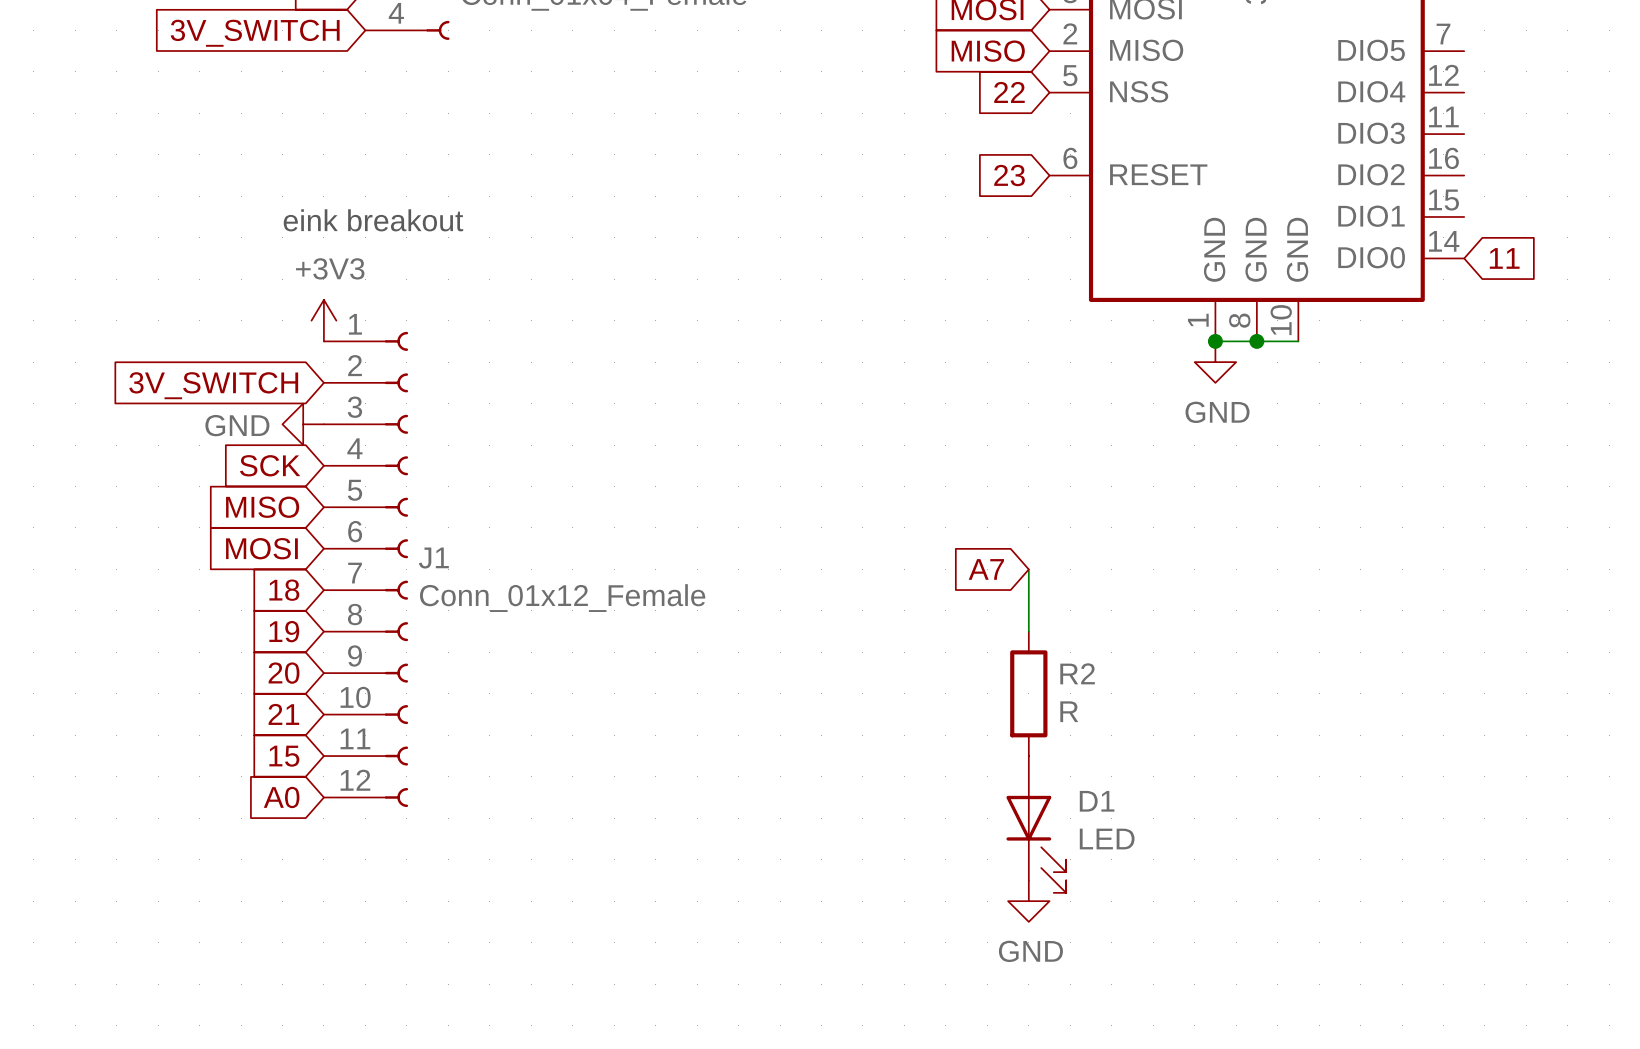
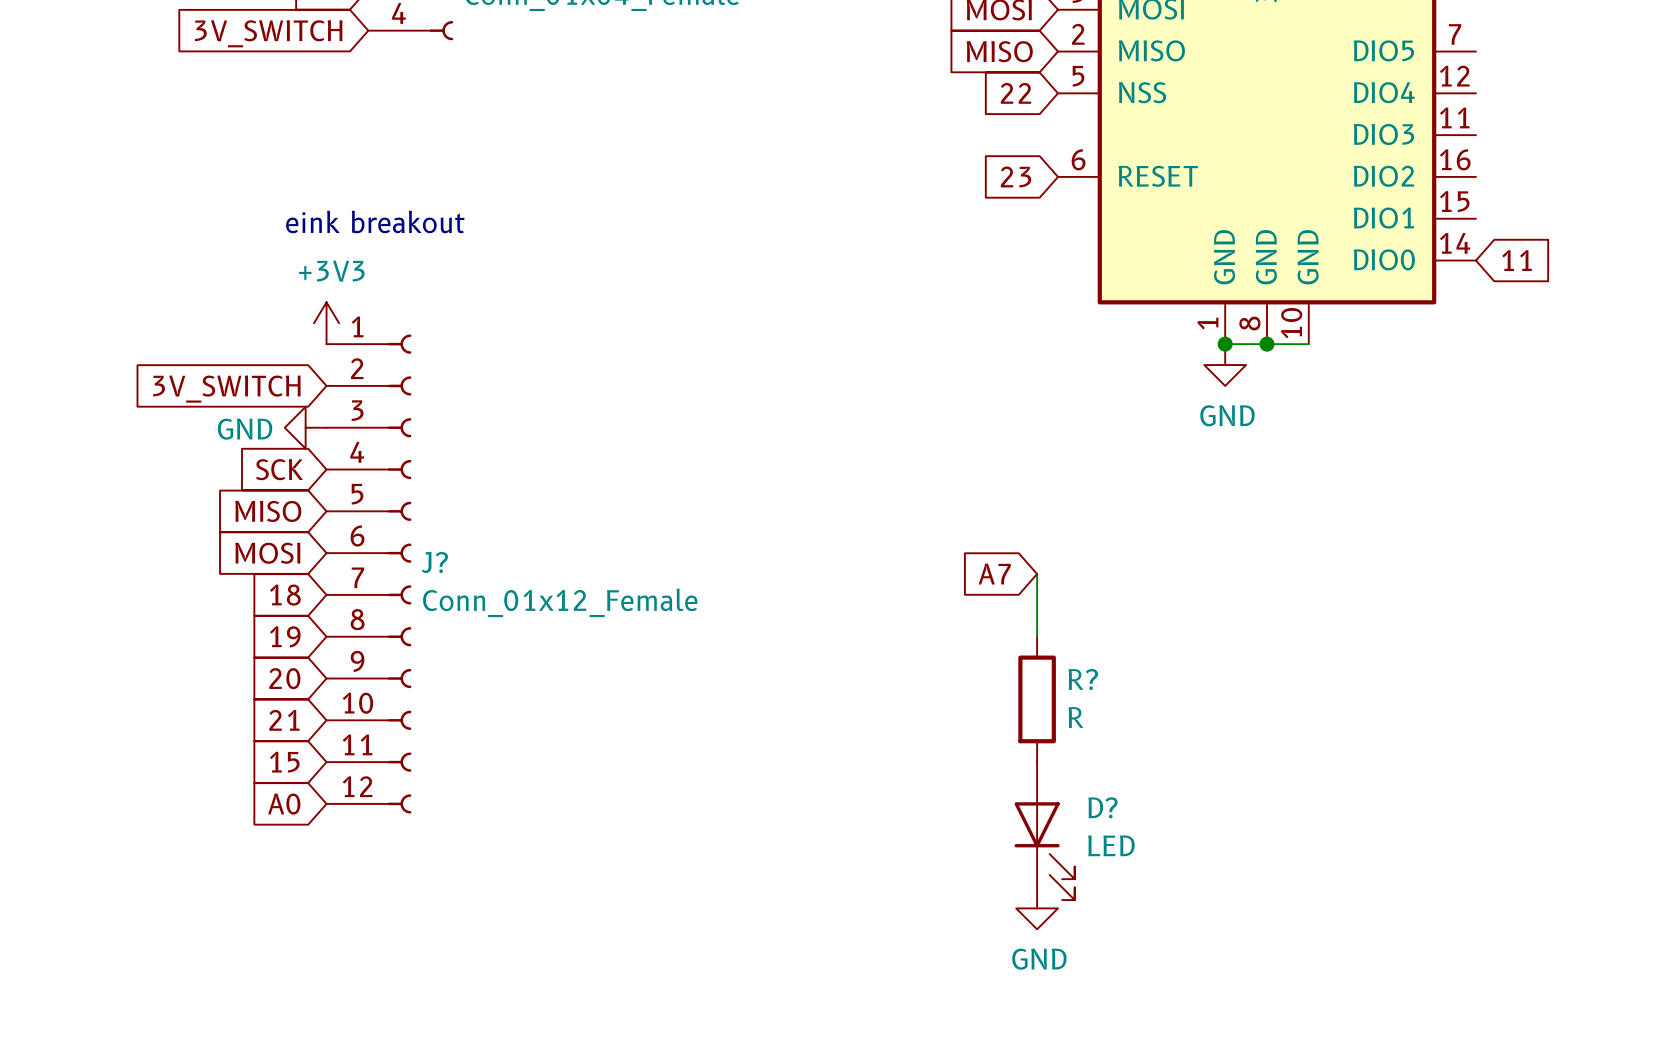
J1 name: J1 (433, 558) -> J? (434, 562)
R2 name: R2 (1077, 673) -> R? (1083, 679)
D1 name: D1 (1097, 801) -> D? (1102, 807)

